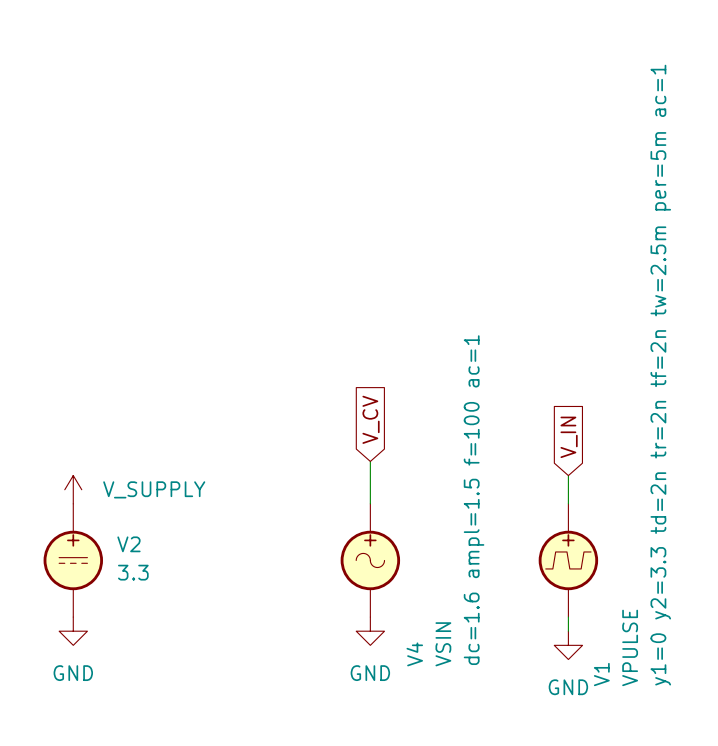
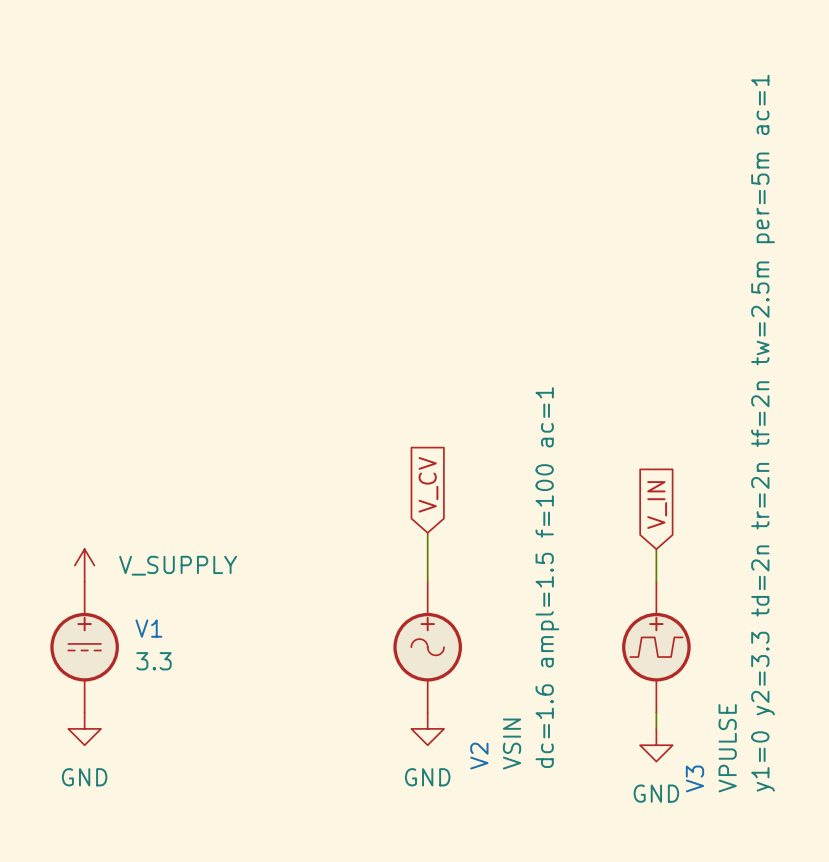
V2 name: V2 (128, 544) -> V1 (148, 628)
V4 name: V4 (414, 654) -> V2 (479, 756)
V1 name: V1 (601, 674) -> V3 (694, 778)

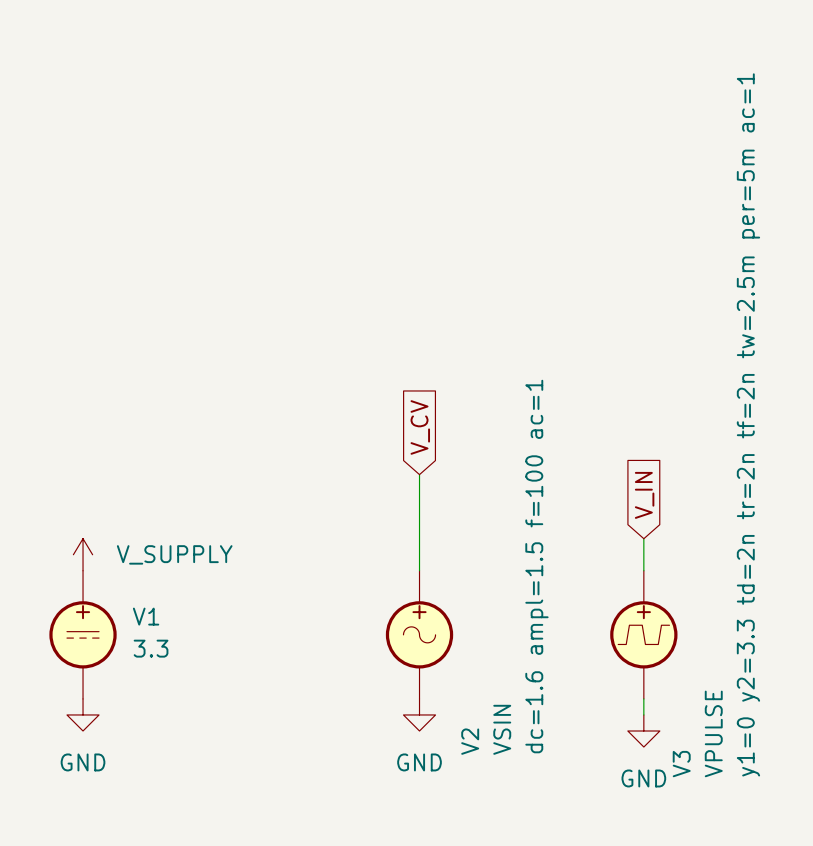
wire: none -> (419, 474) (419, 522)
global label position: V_CV (428, 484) -> V_CV (420, 427)

